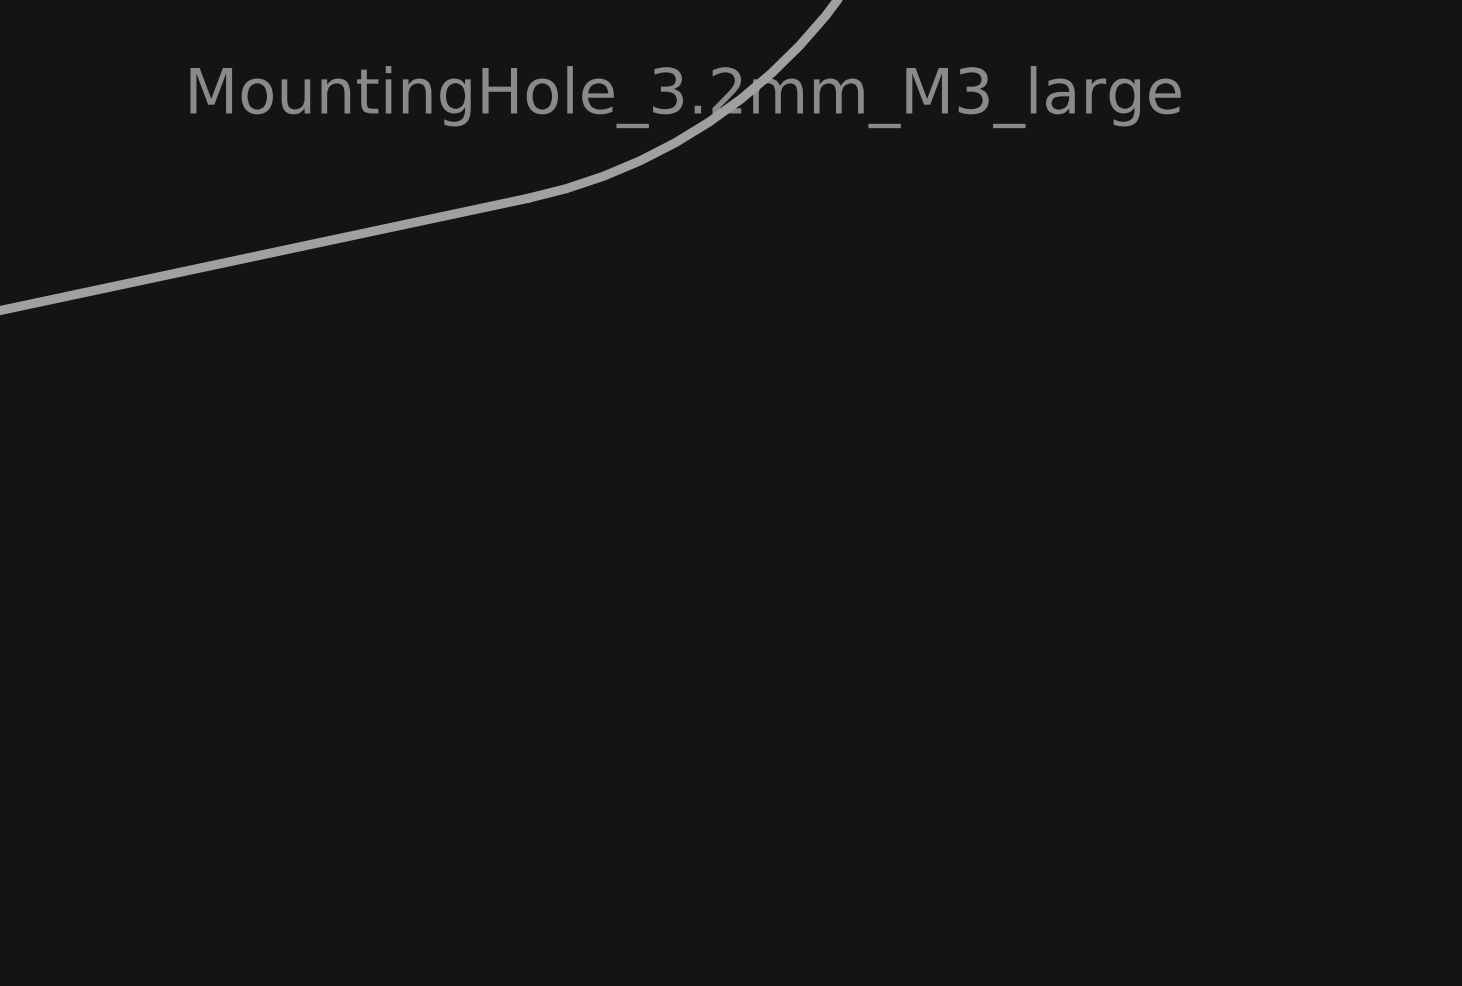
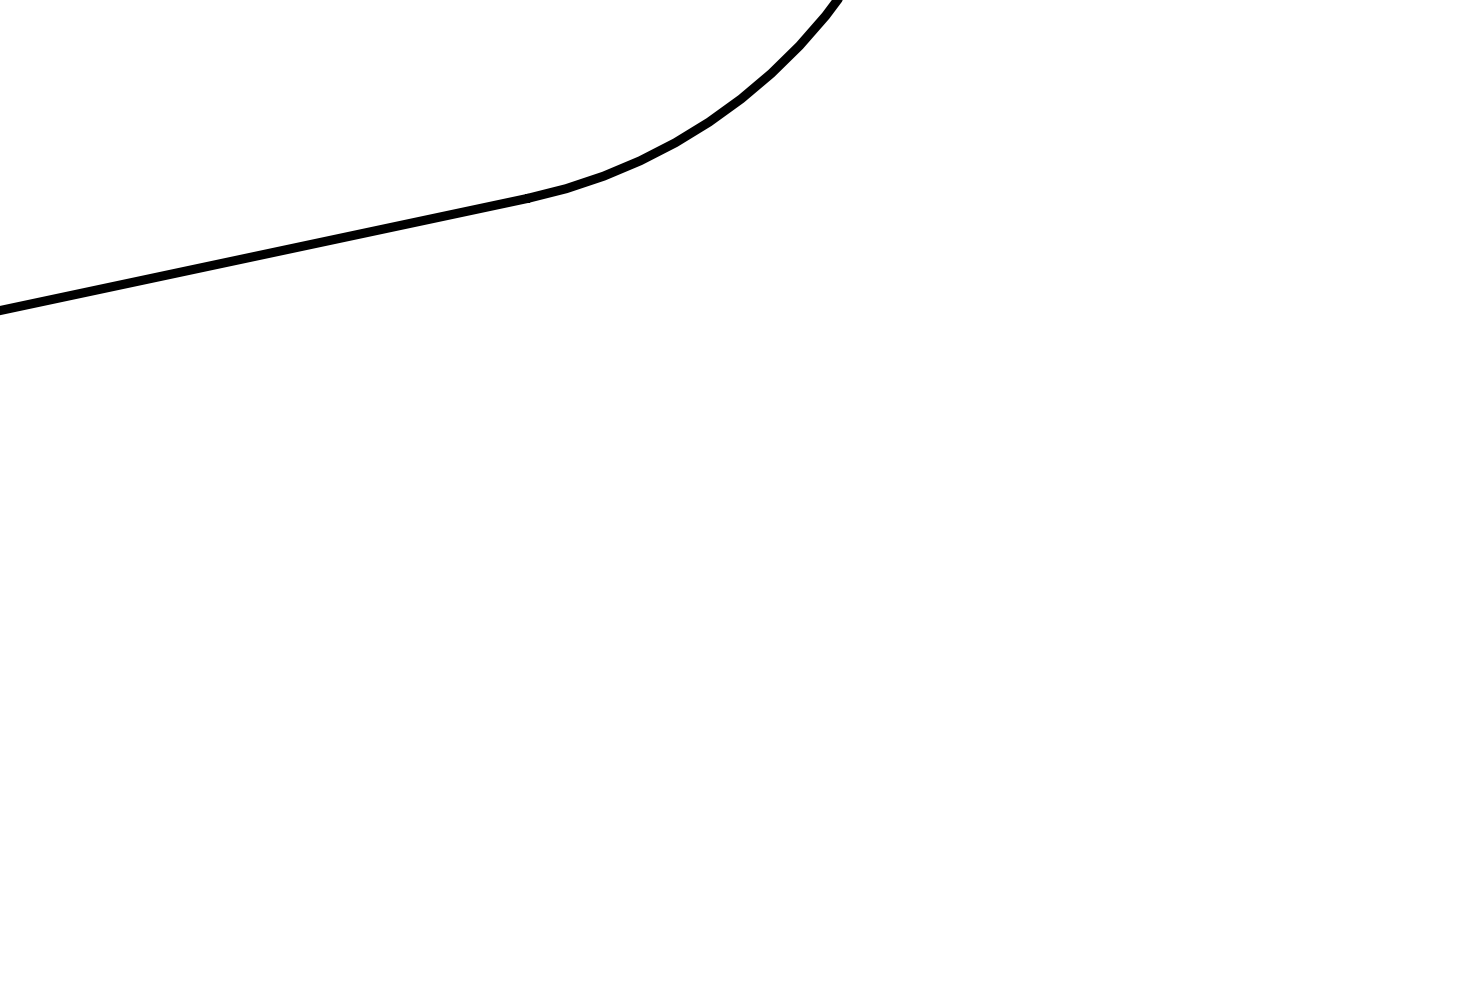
part value: MountingHole_3.2mm_M3_large (685, 97) -> none

